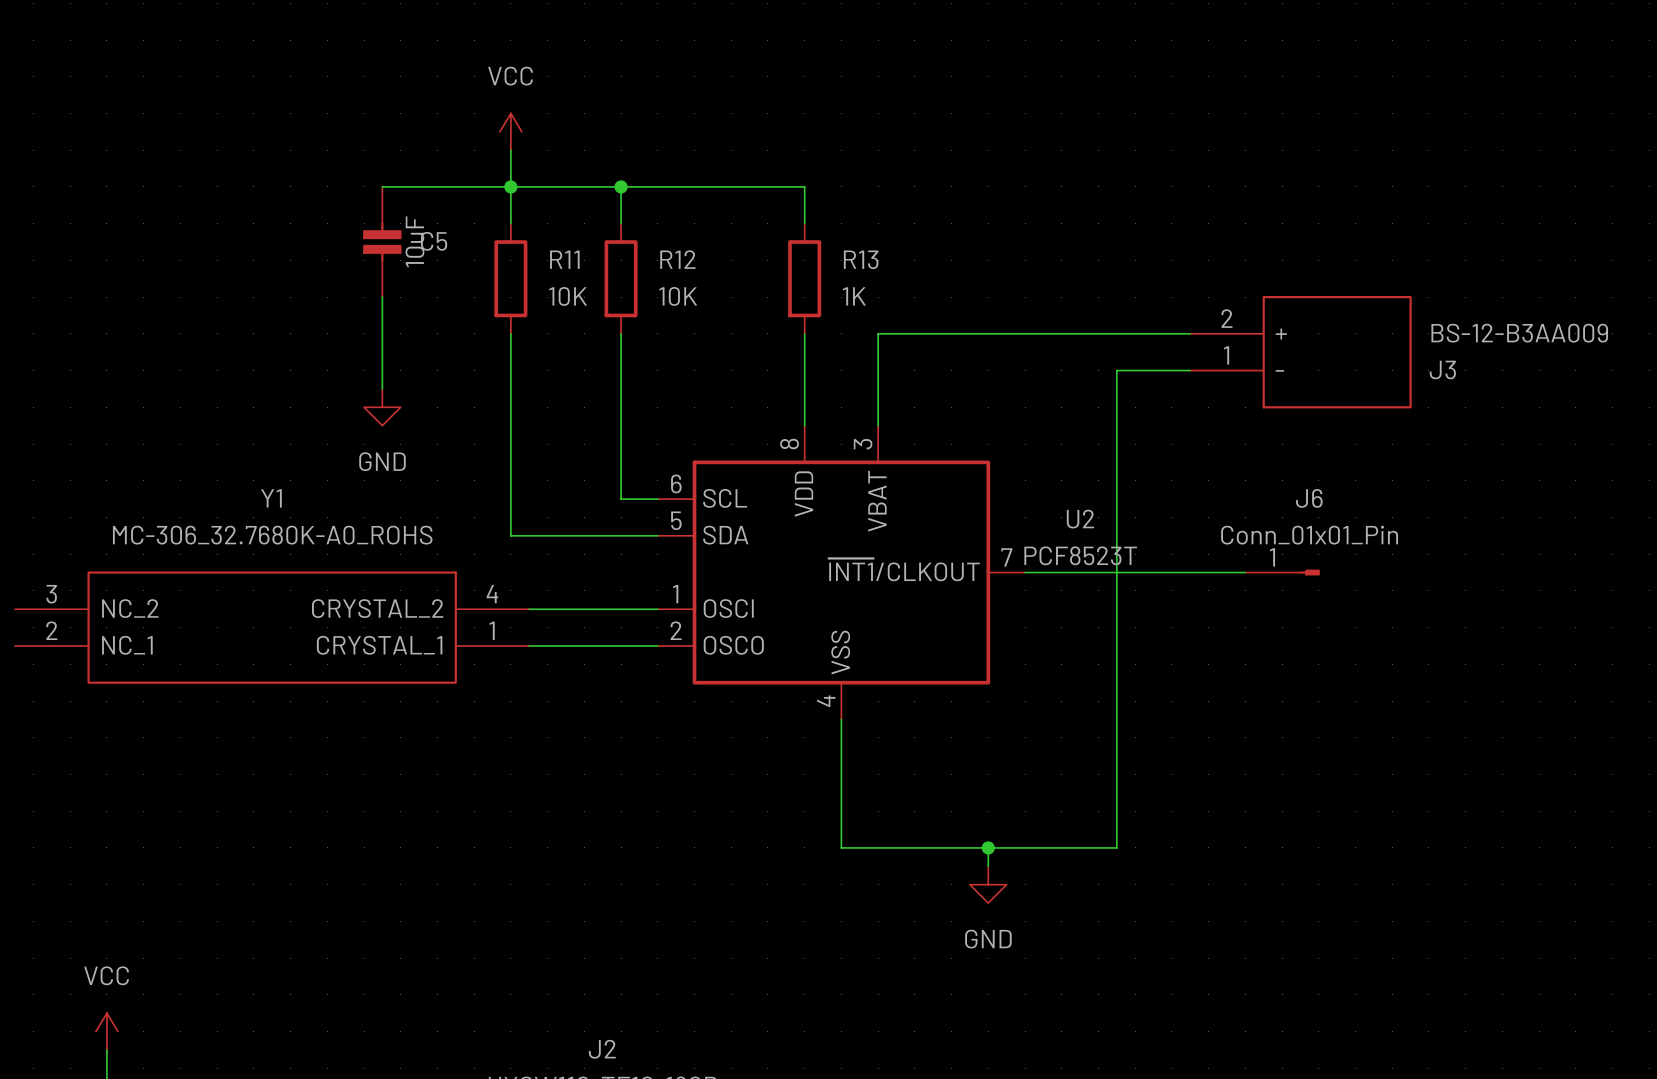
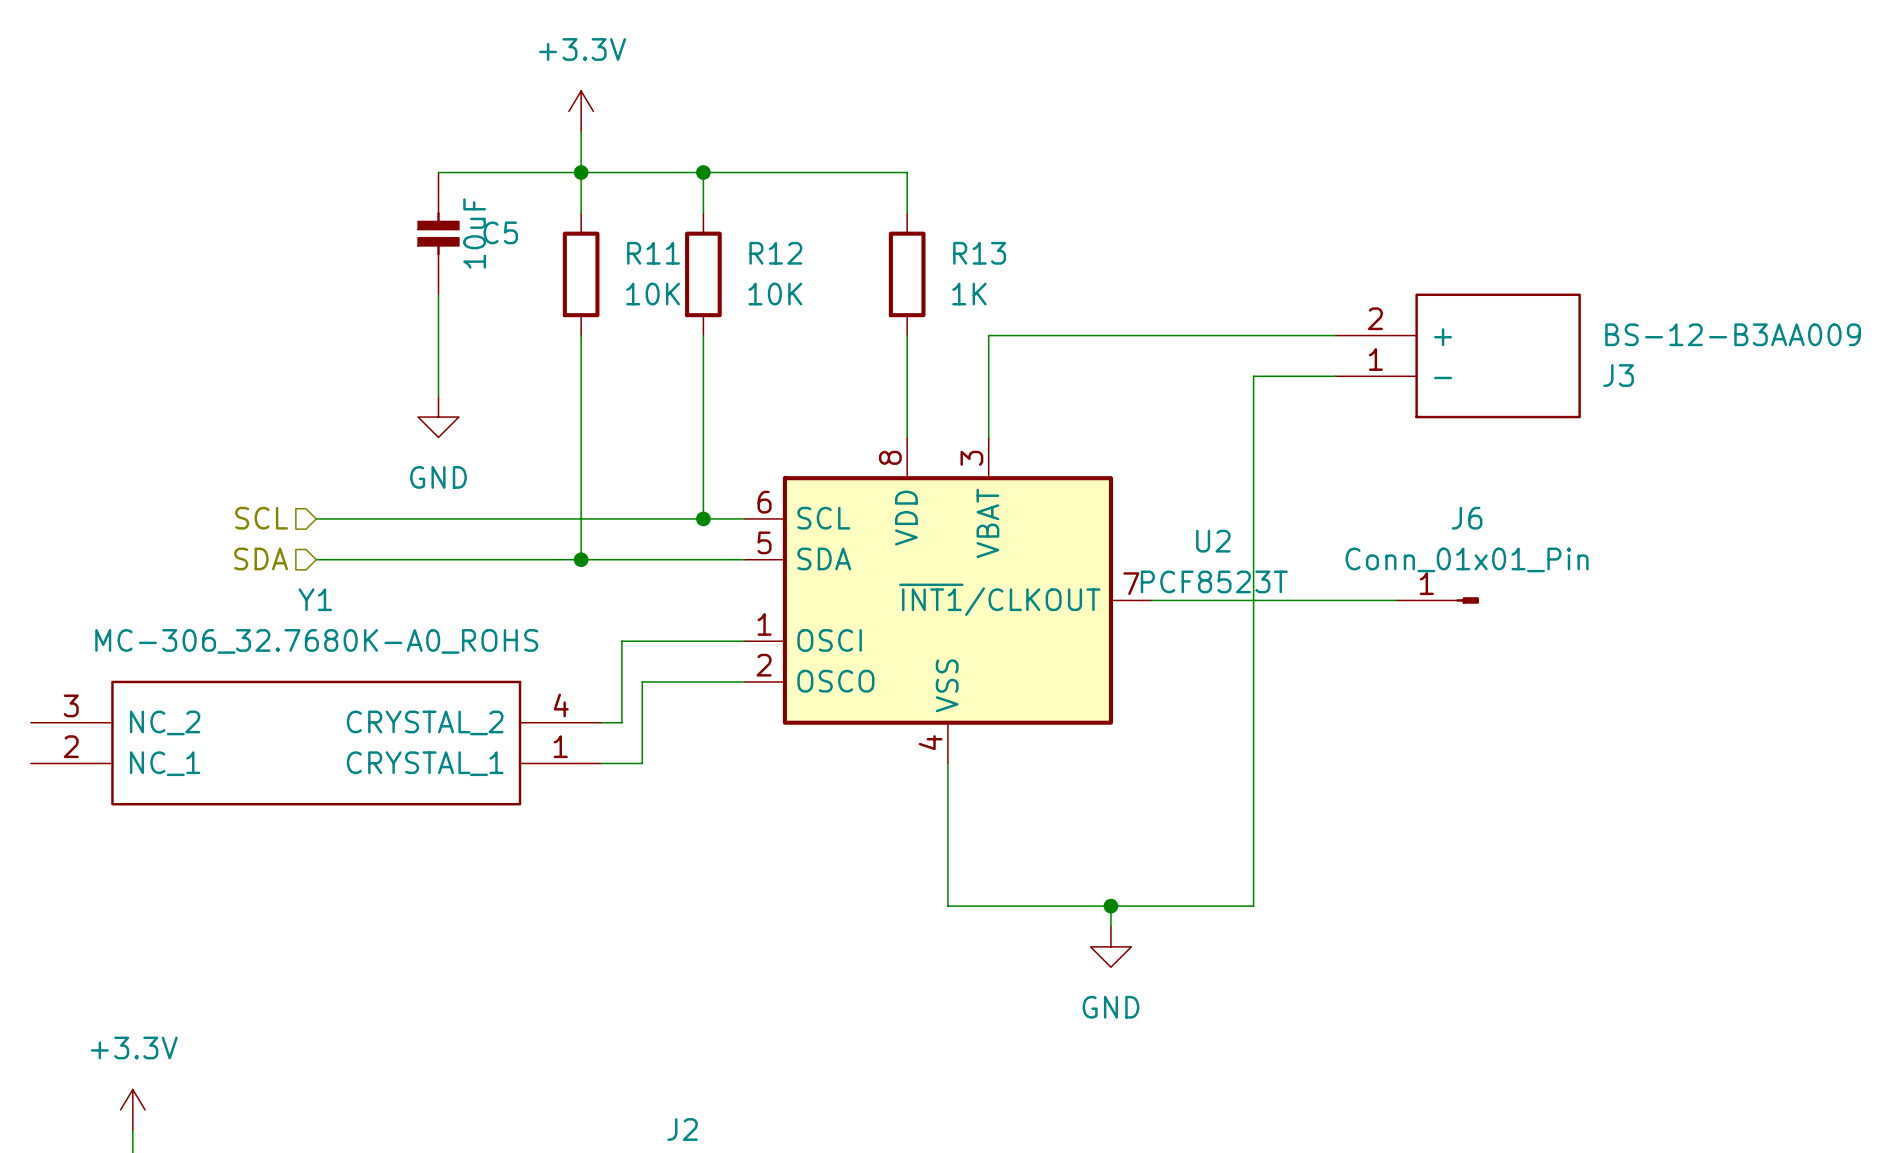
power symbol: VCC (510, 131) -> +3.3V (581, 111)
hierarchical label: none -> SCL (261, 518)
wire: none -> (316, 518) (703, 518)
junction: none -> (703, 518)
hierarchical label: none -> SDA (261, 558)
wire: none -> (316, 559) (581, 559)
junction: none -> (581, 559)
wire: (529, 609) (547, 609) -> (601, 722) (621, 722) (621, 641)
Y1 position: (272, 627) -> (316, 743)
wire: (529, 645) (565, 645) -> (601, 763) (642, 763) (642, 681)
power symbol: VCC (106, 1031) -> +3.3V (132, 1109)

